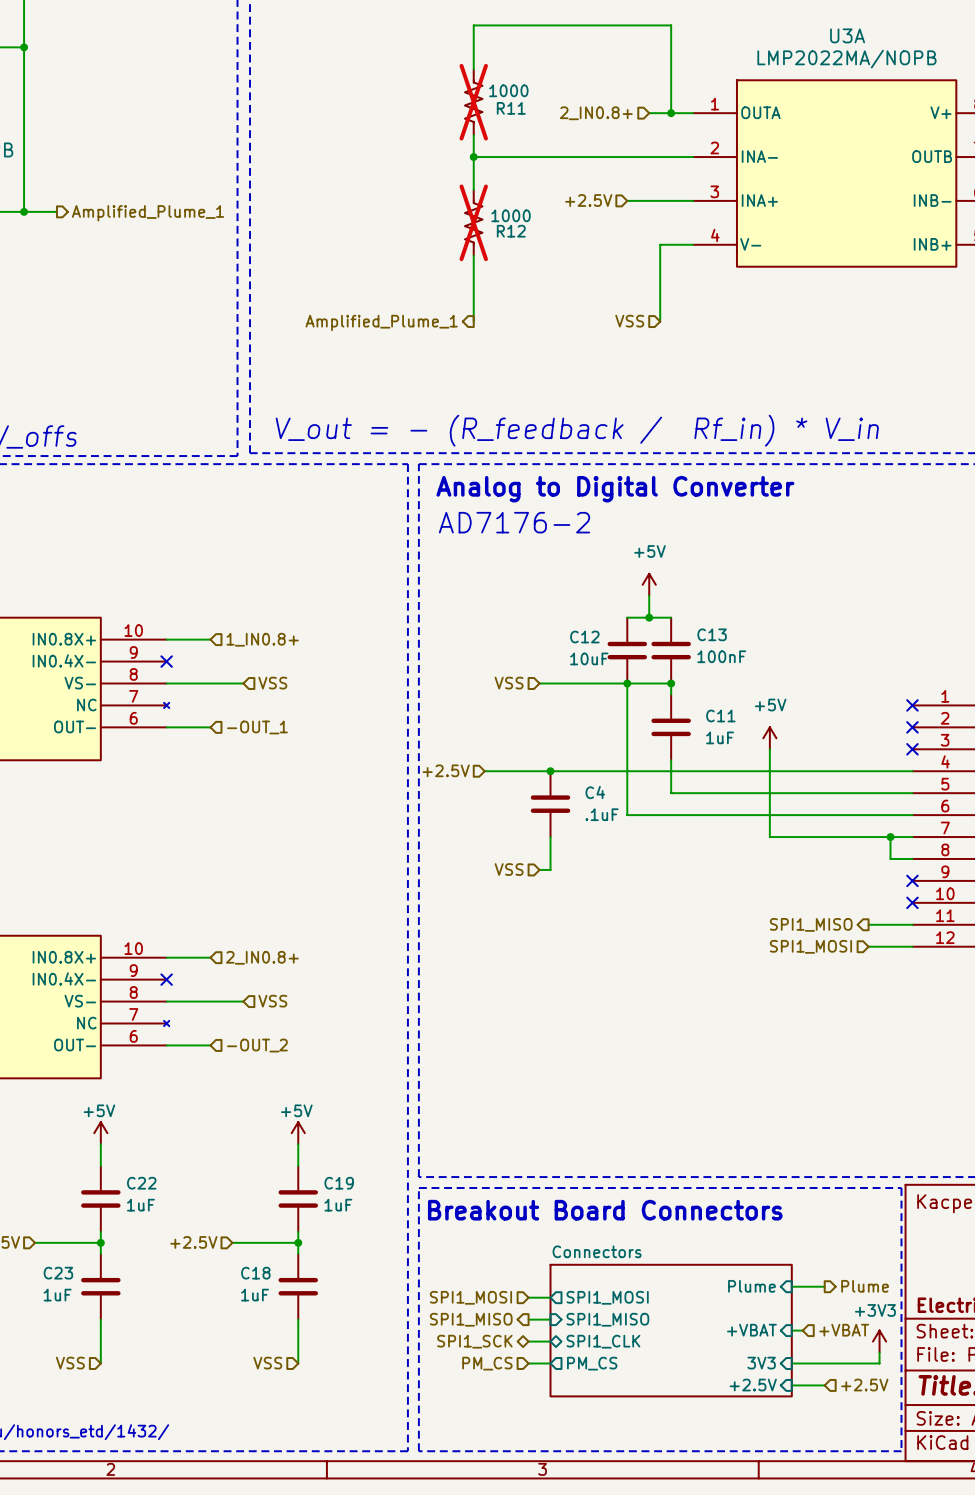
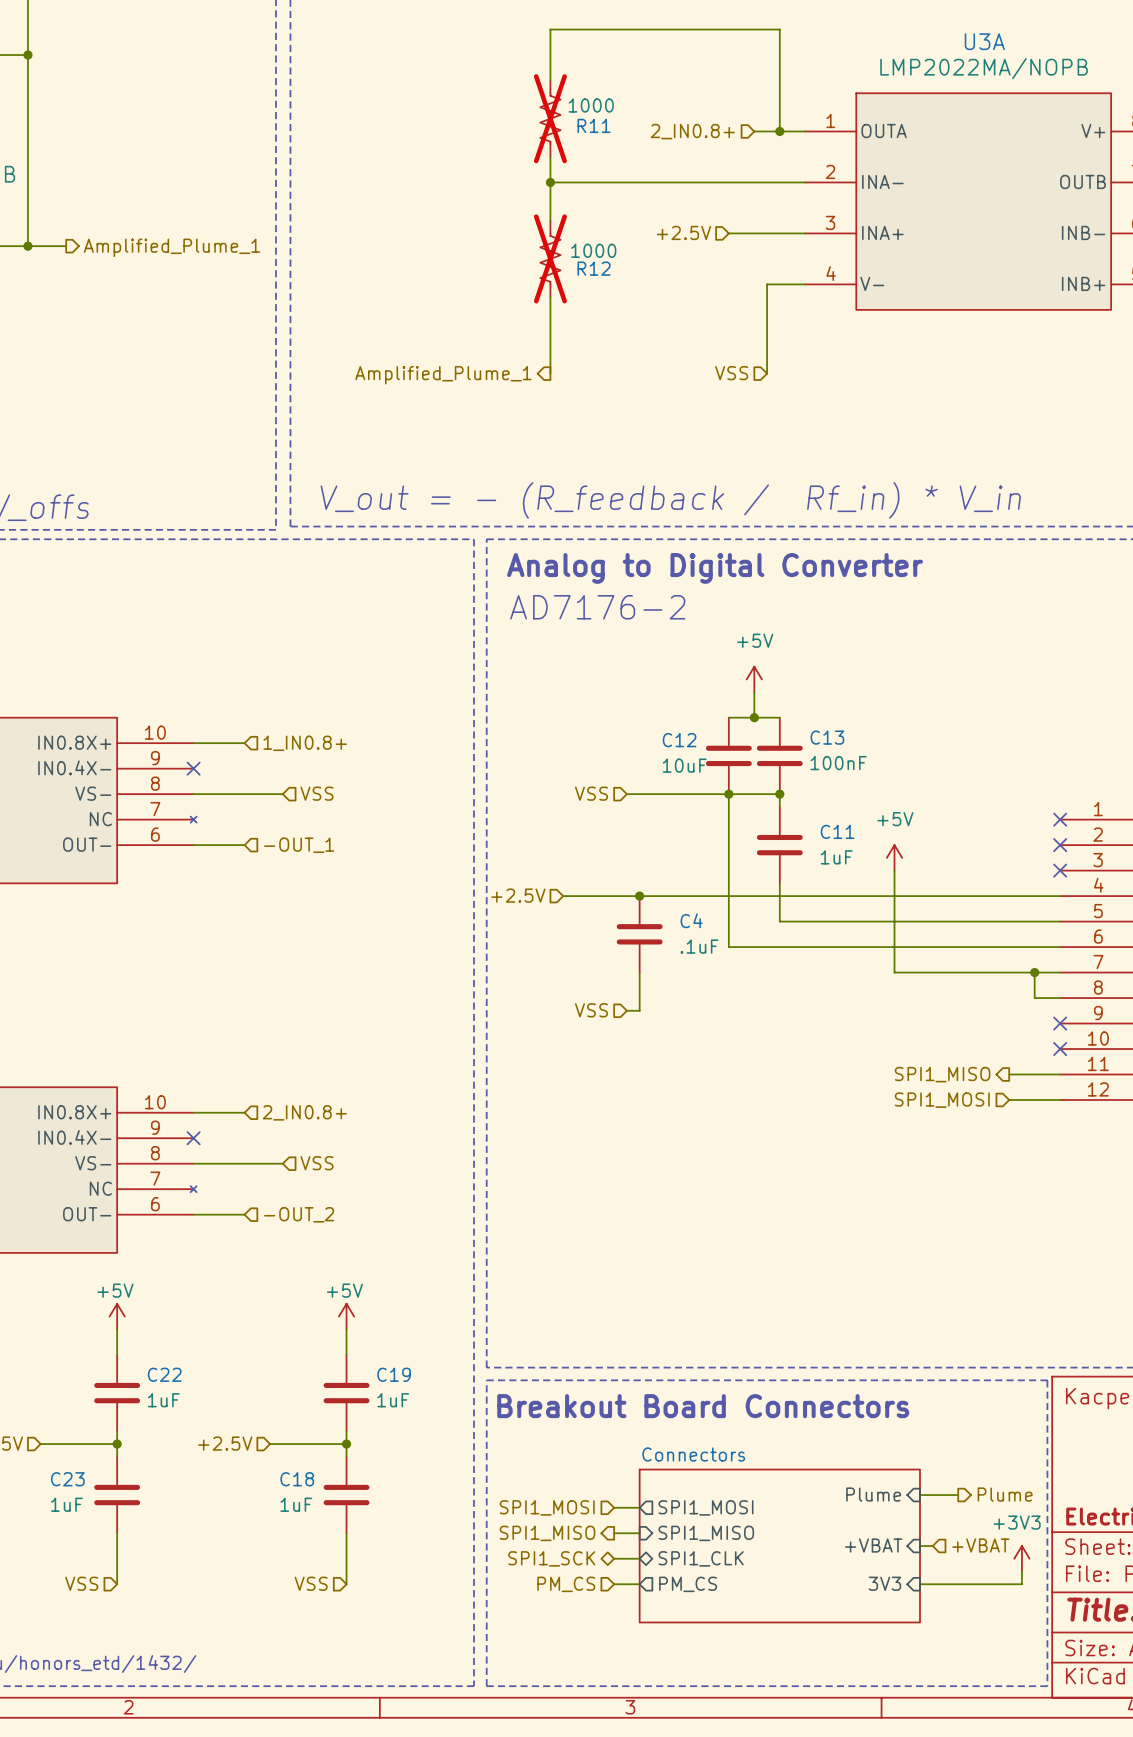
sheet pin: +2.5V (753, 1385) -> none
wire: (791, 1385) (824, 1385) -> none
hierarchical label: +2.5V (864, 1385) -> none

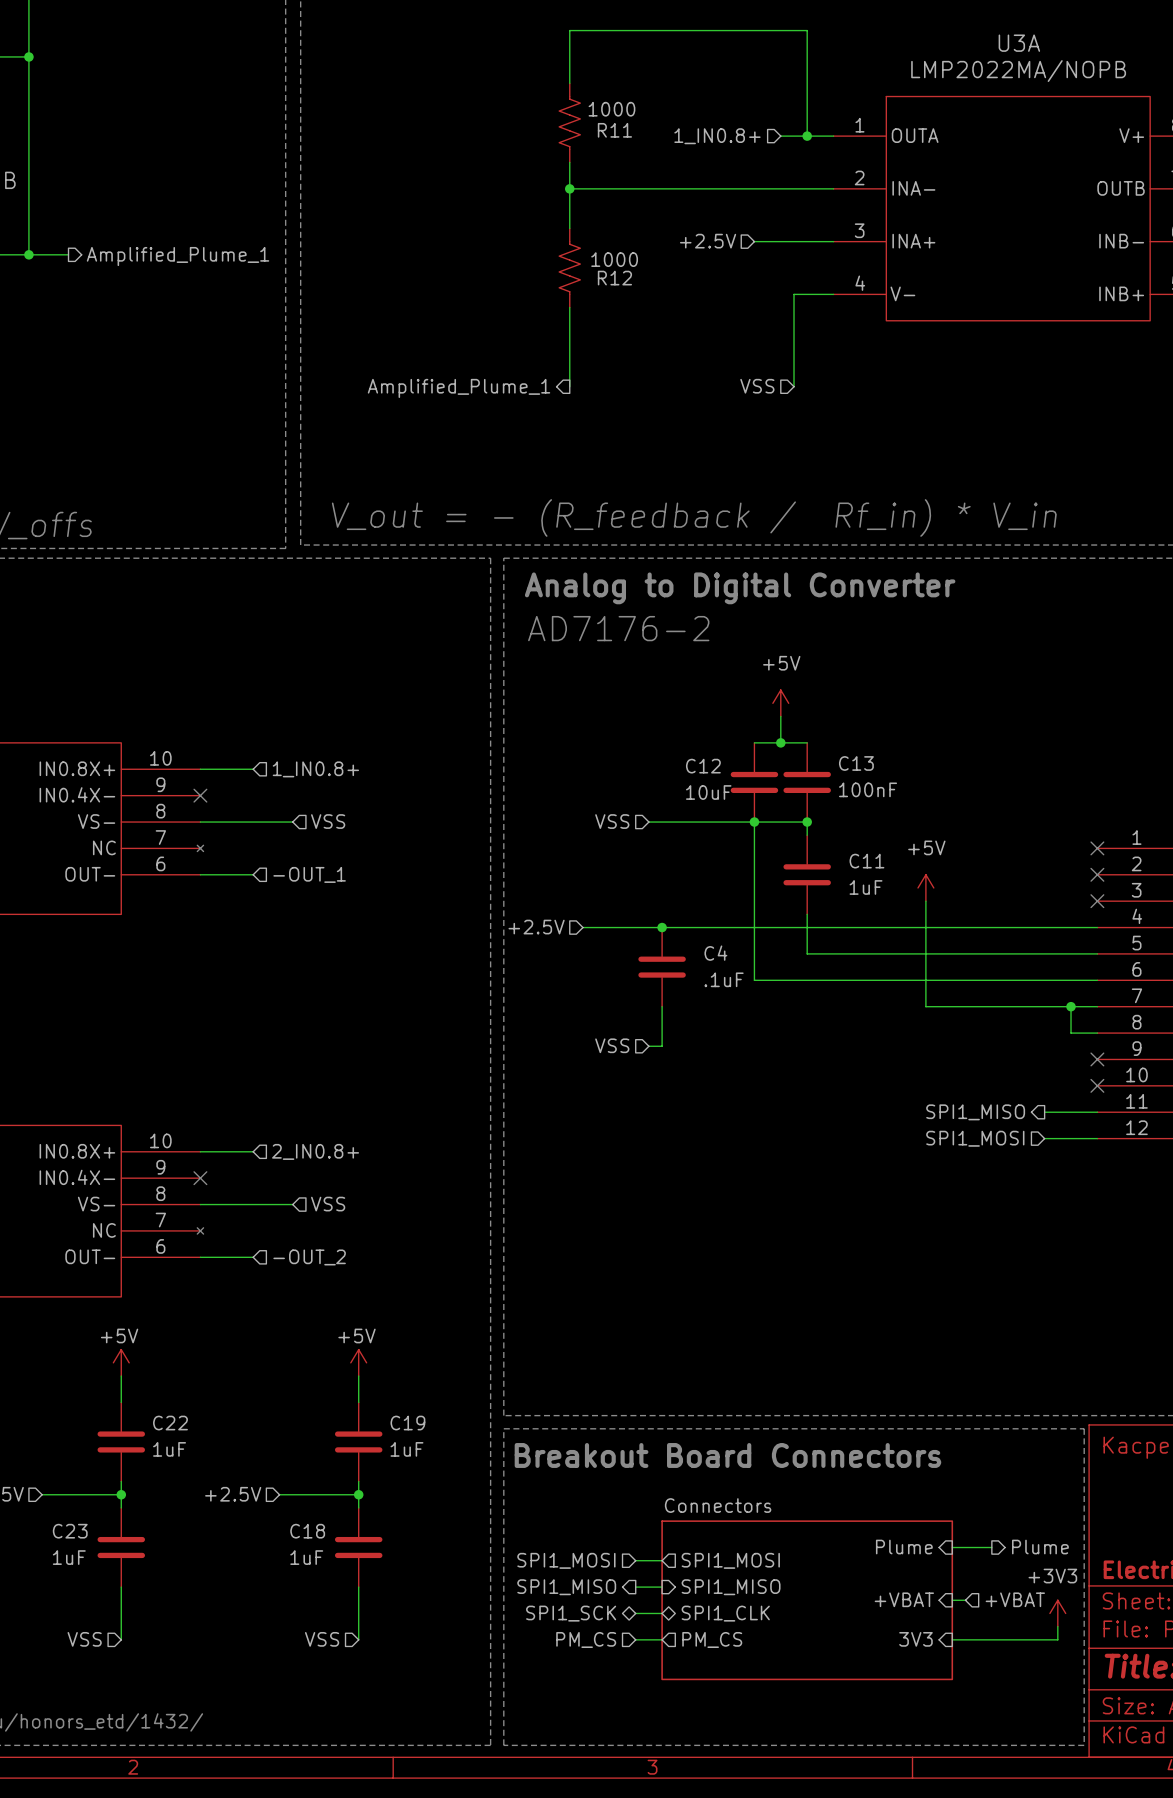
R11 do-not-place cross: (550, 118) -> none
hierarchical label: 2_IN0.8+ (692, 131) -> 1_IN0.8+ (717, 136)
R12 do-not-place cross: (550, 258) -> none

